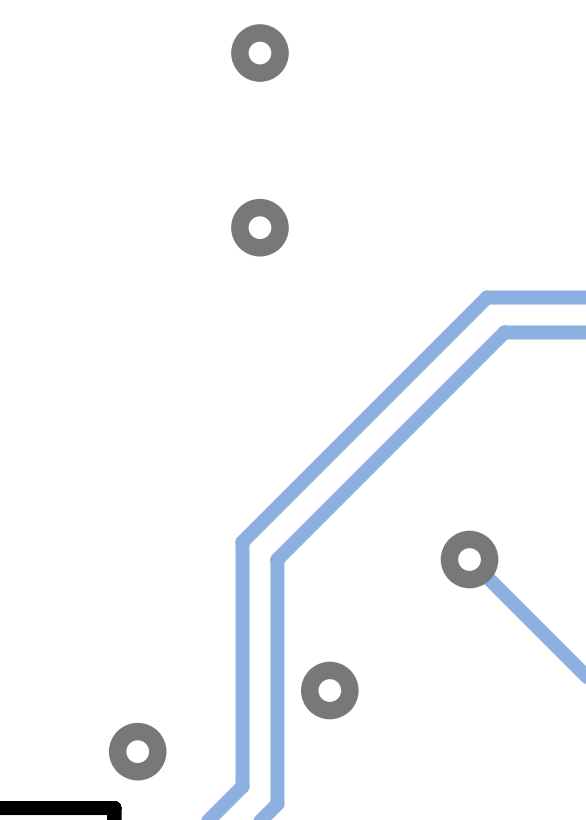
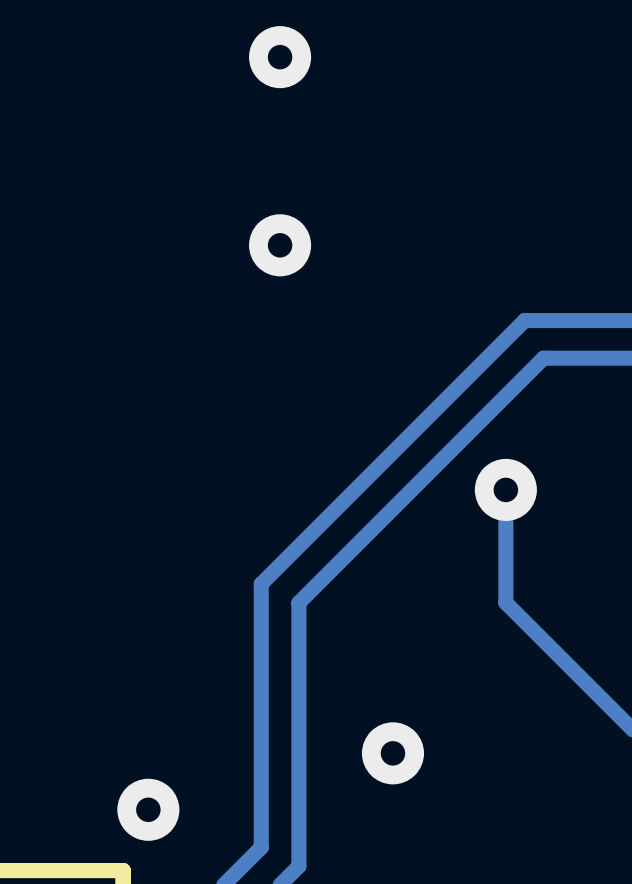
track: none -> (505, 489) (505, 602)
via: none -> (505, 489)
via: (469, 559) -> none
via position: (329, 690) -> (392, 753)

